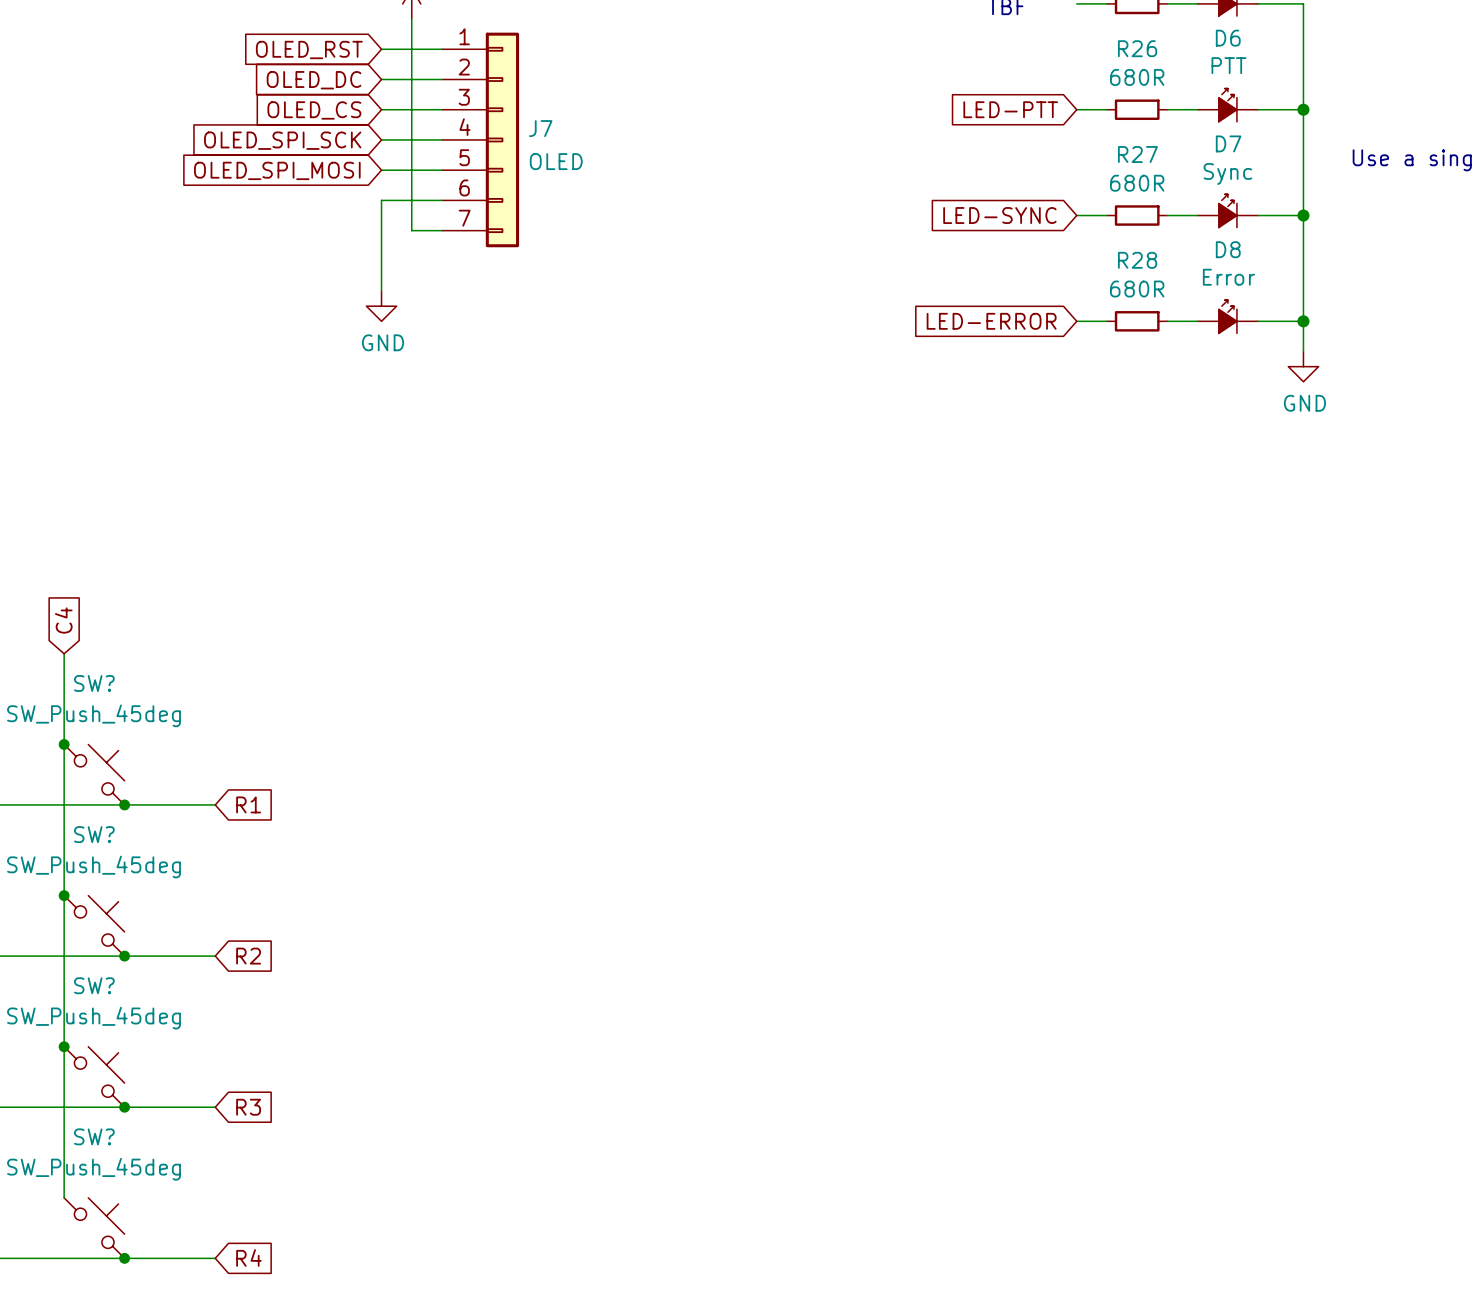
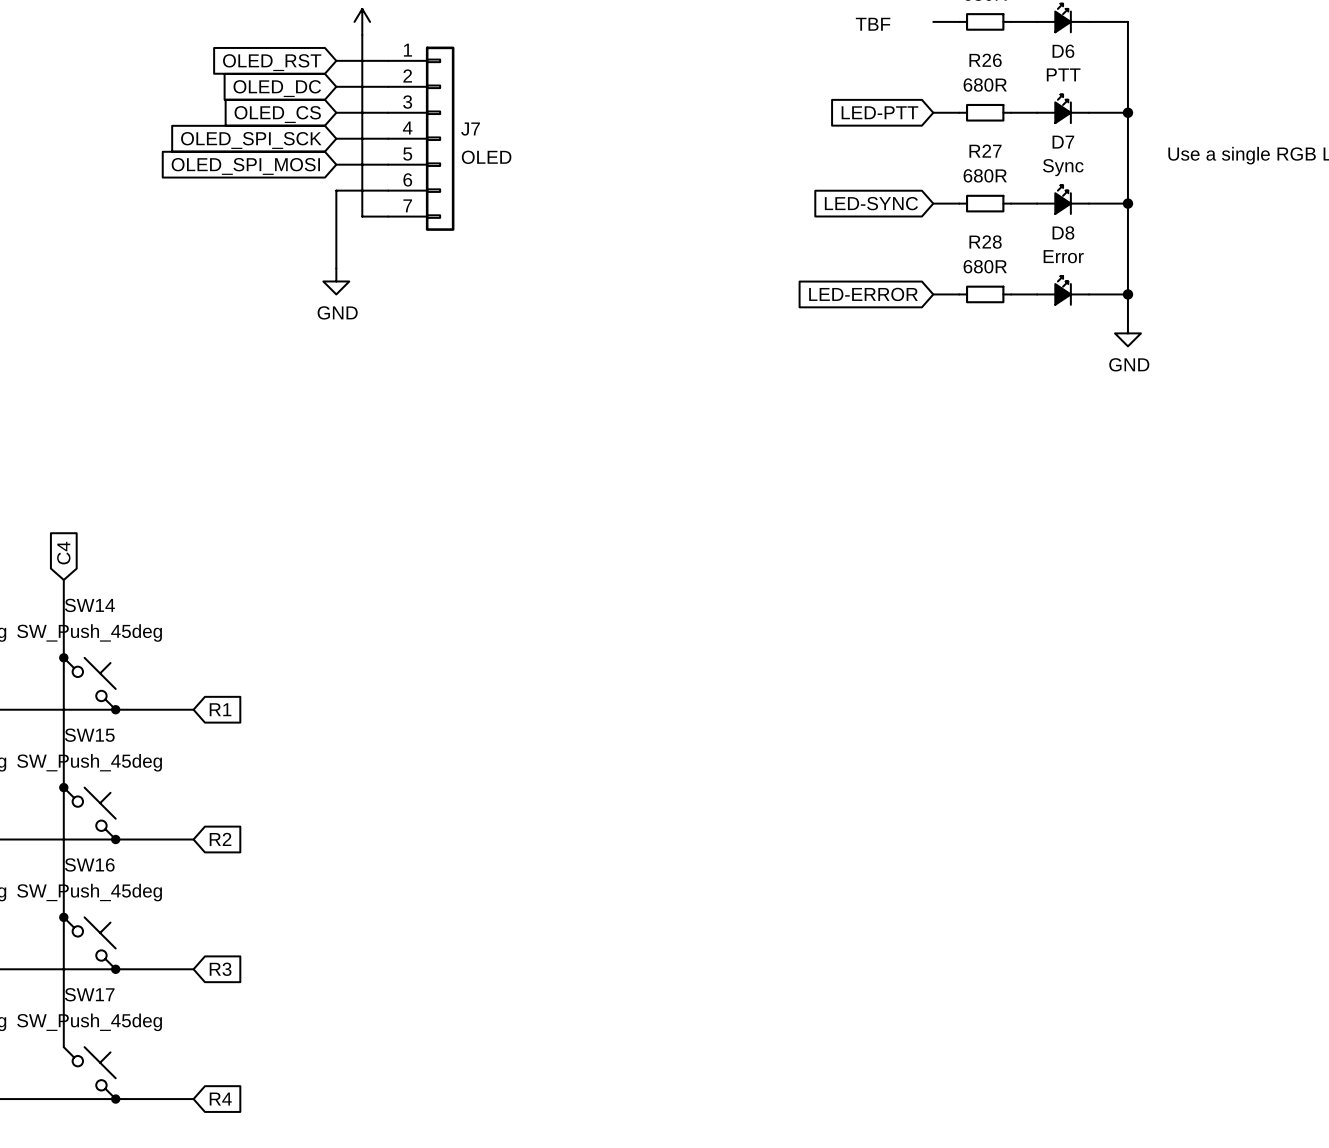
SW? name: SW? (94, 683) -> SW14 (89, 605)
SW? name: SW? (94, 834) -> SW15 (89, 735)
SW? name: SW? (94, 985) -> SW16 (89, 864)
SW? name: SW? (94, 1136) -> SW17 (89, 994)

